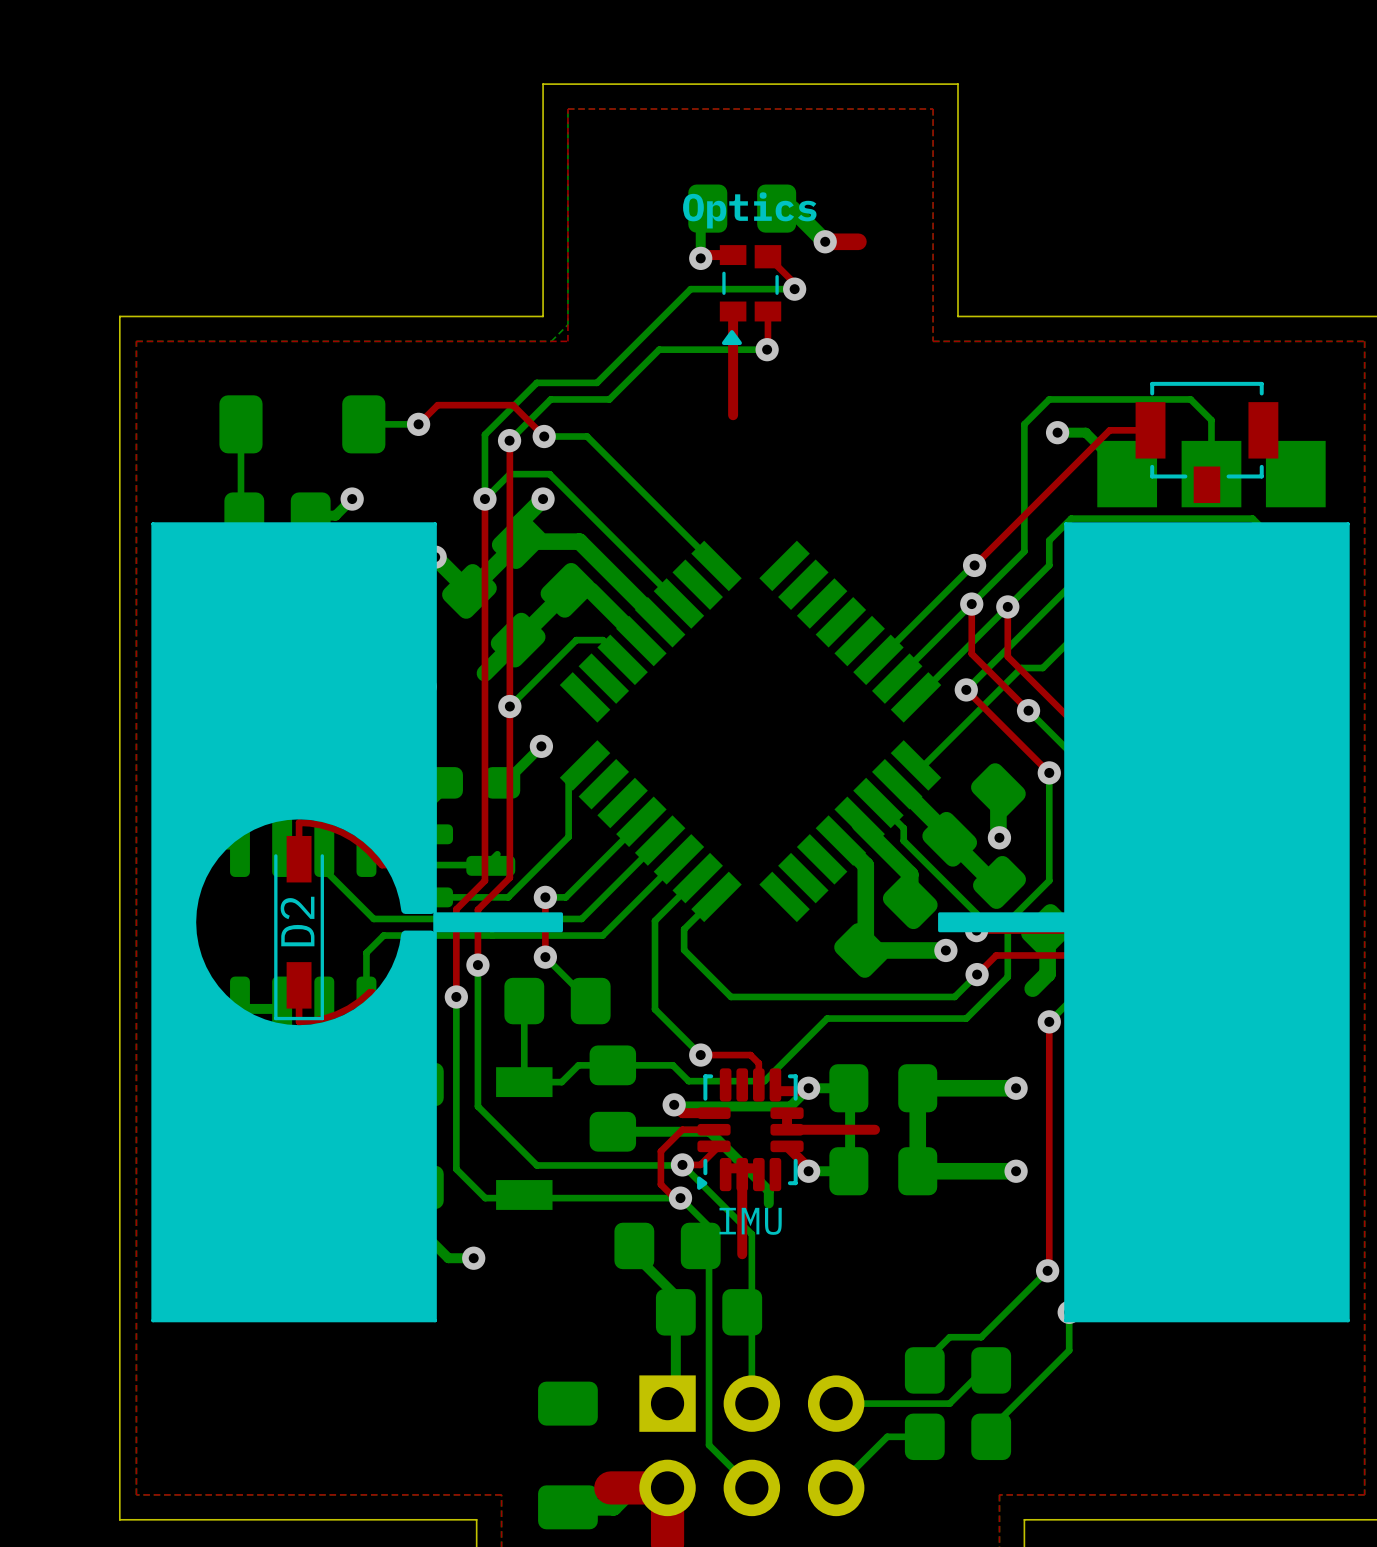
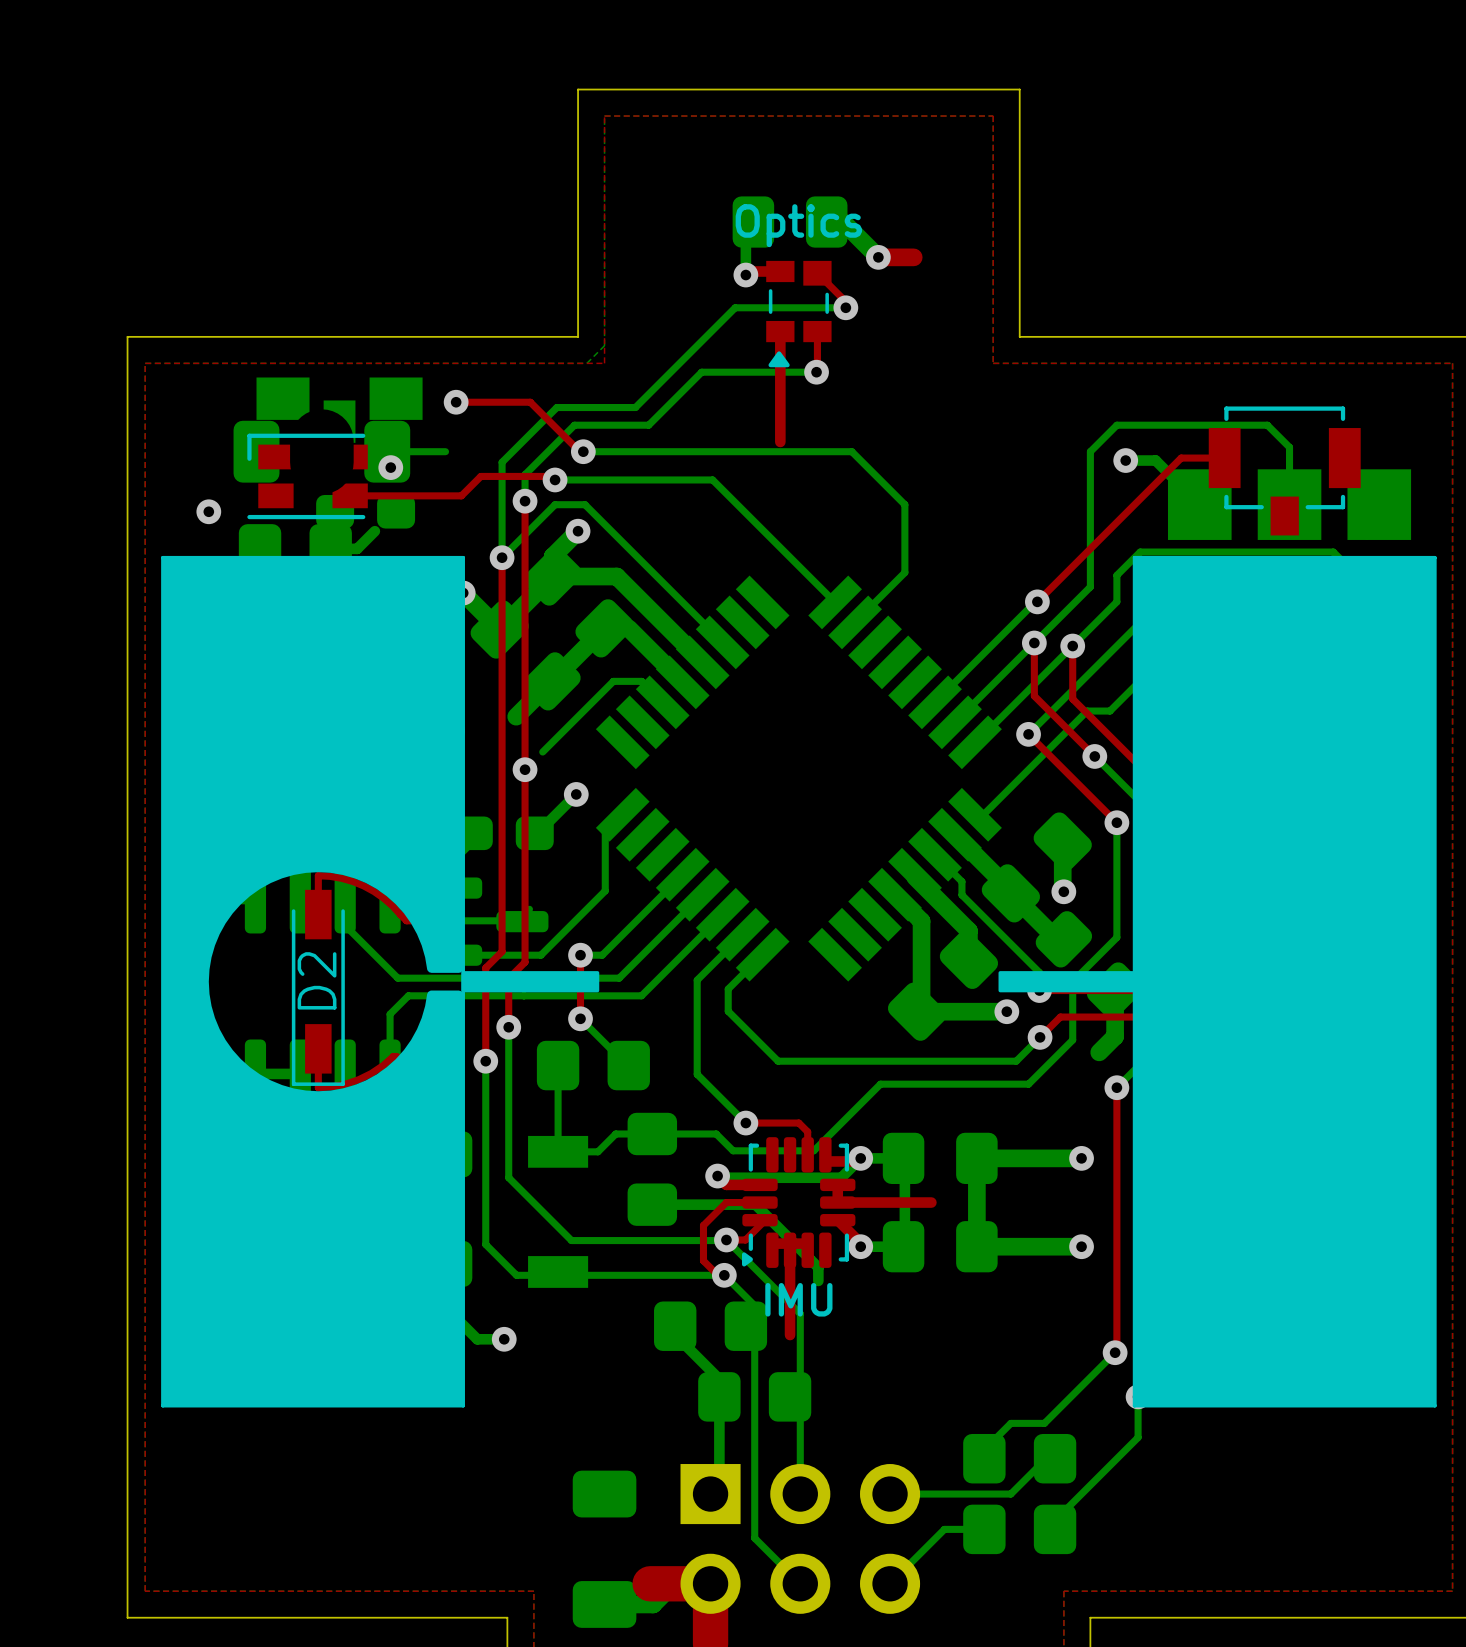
top track: none -> (456, 402) (530, 402) (579, 451) (583, 451)
via: none -> (456, 402)
bottom track: (536, 382) (484, 434) (484, 499) (509, 474) (521, 474) -> (571, 407) (556, 407) (502, 462) (502, 557) (555, 504)
part: none -> (339, 410)
bottom track: (550, 399) (509, 440) -> (586, 425) (574, 425) (525, 474) (525, 501)
bottom track: (240, 424) (240, 513) (242, 515) -> none
top track: (418, 424) (437, 405) (512, 405) (544, 436) -> none
via: (418, 424) -> none
bottom track: none -> (583, 451) (851, 451) (904, 504) (904, 572) (855, 622)
bottom track: (544, 436) (587, 436) (716, 565) -> none
via position: (544, 436) -> (583, 451)
via: none -> (390, 467)
top track: (509, 440) (509, 877) (477, 909) (477, 919) -> (525, 501) (525, 962) (508, 978)
via position: (509, 440) -> (555, 479)
part: none -> (307, 476)
top track: none -> (555, 479) (551, 476) (480, 476) (461, 495) (345, 495)
bottom track: none -> (555, 479) (712, 479) (835, 602)
via: none -> (525, 501)
via: none -> (208, 511)
part: none -> (365, 511)
via: (352, 499) -> none
top track: (484, 499) (484, 880) (471, 894) -> (502, 557) (502, 951)
via: (484, 499) -> none
via: none -> (502, 557)
via position: (509, 706) -> (525, 769)

